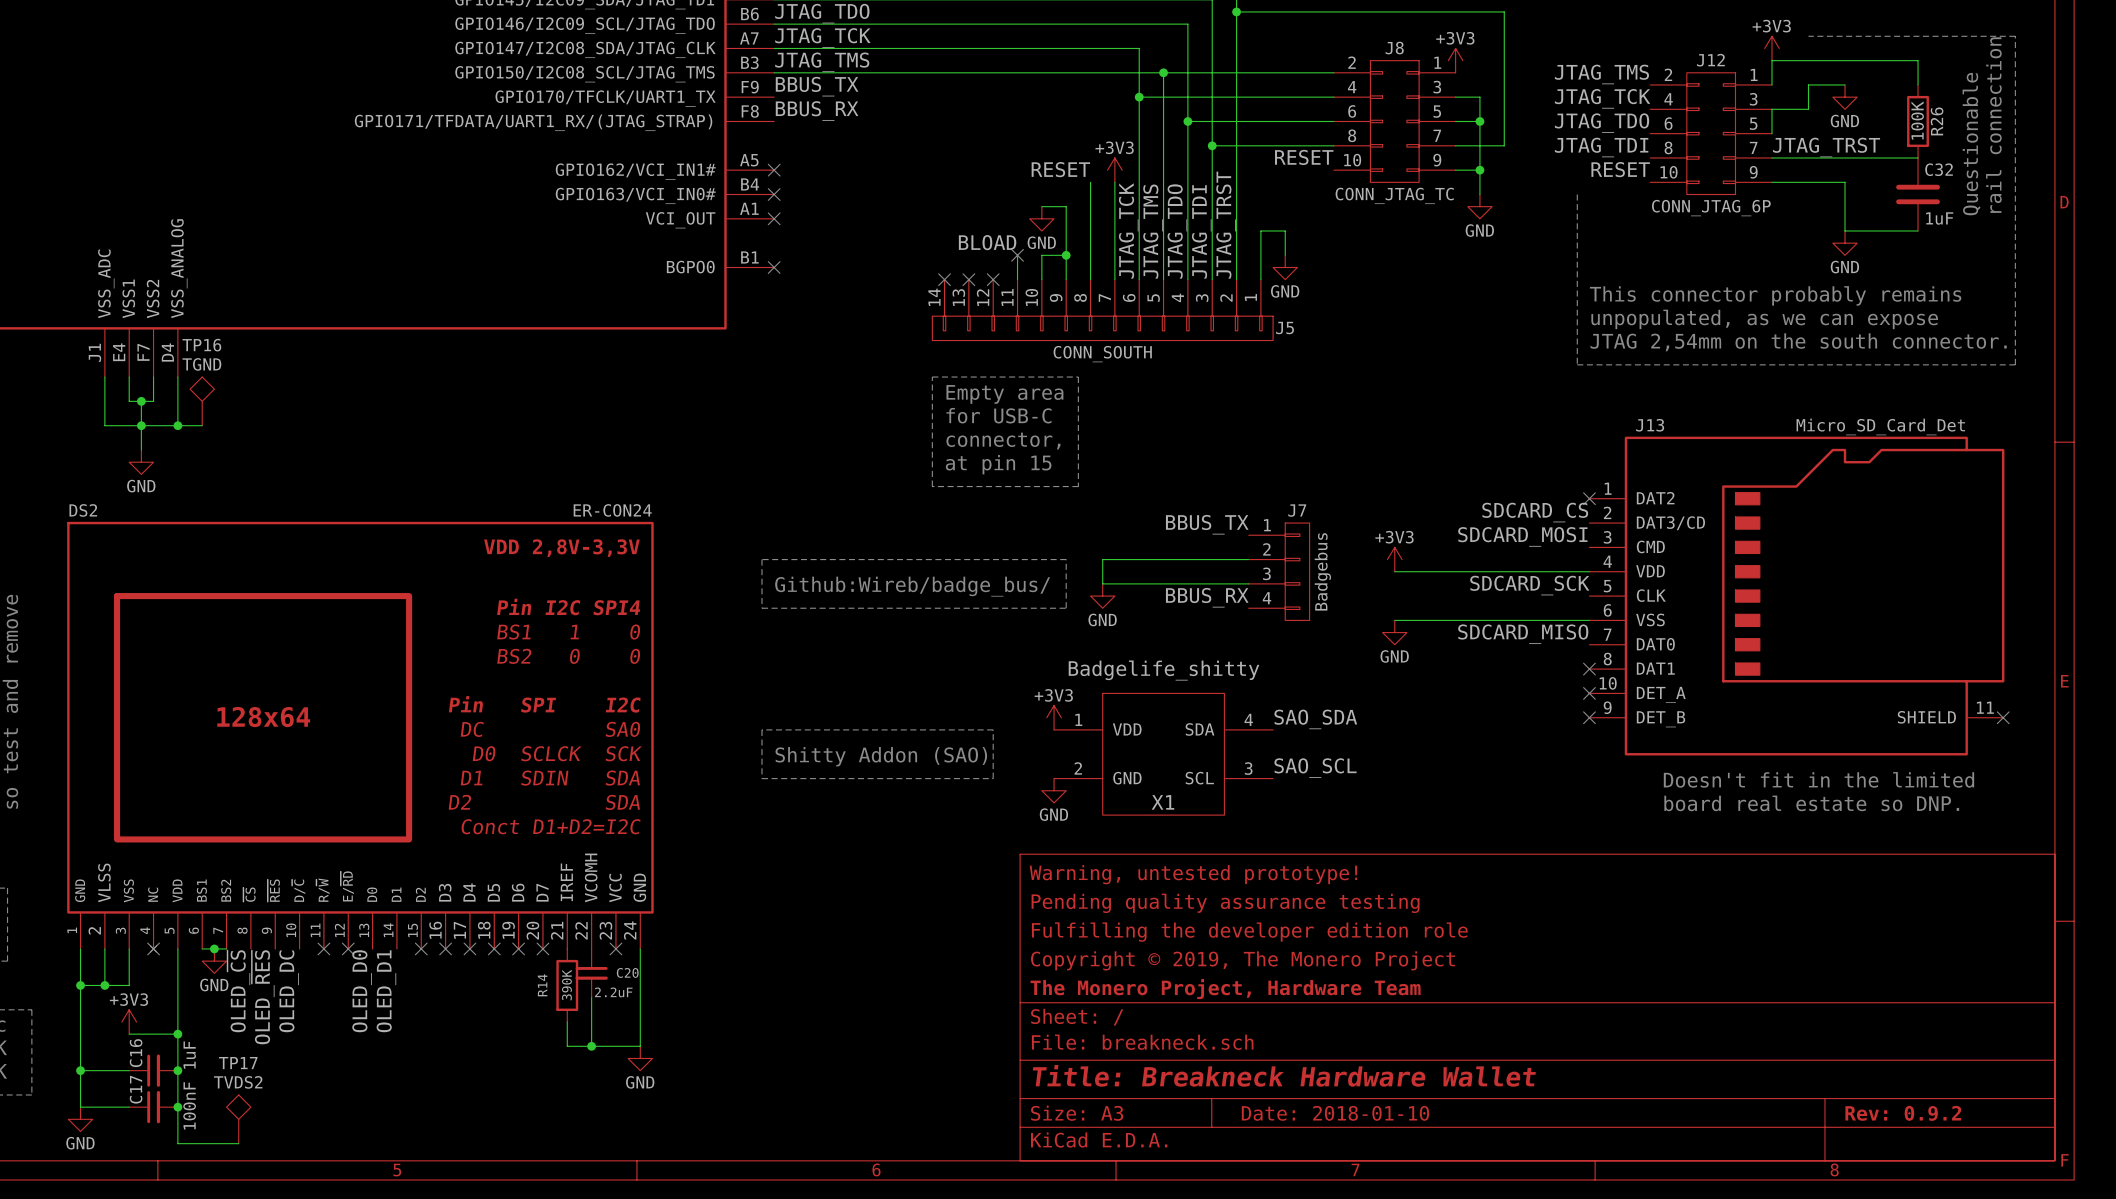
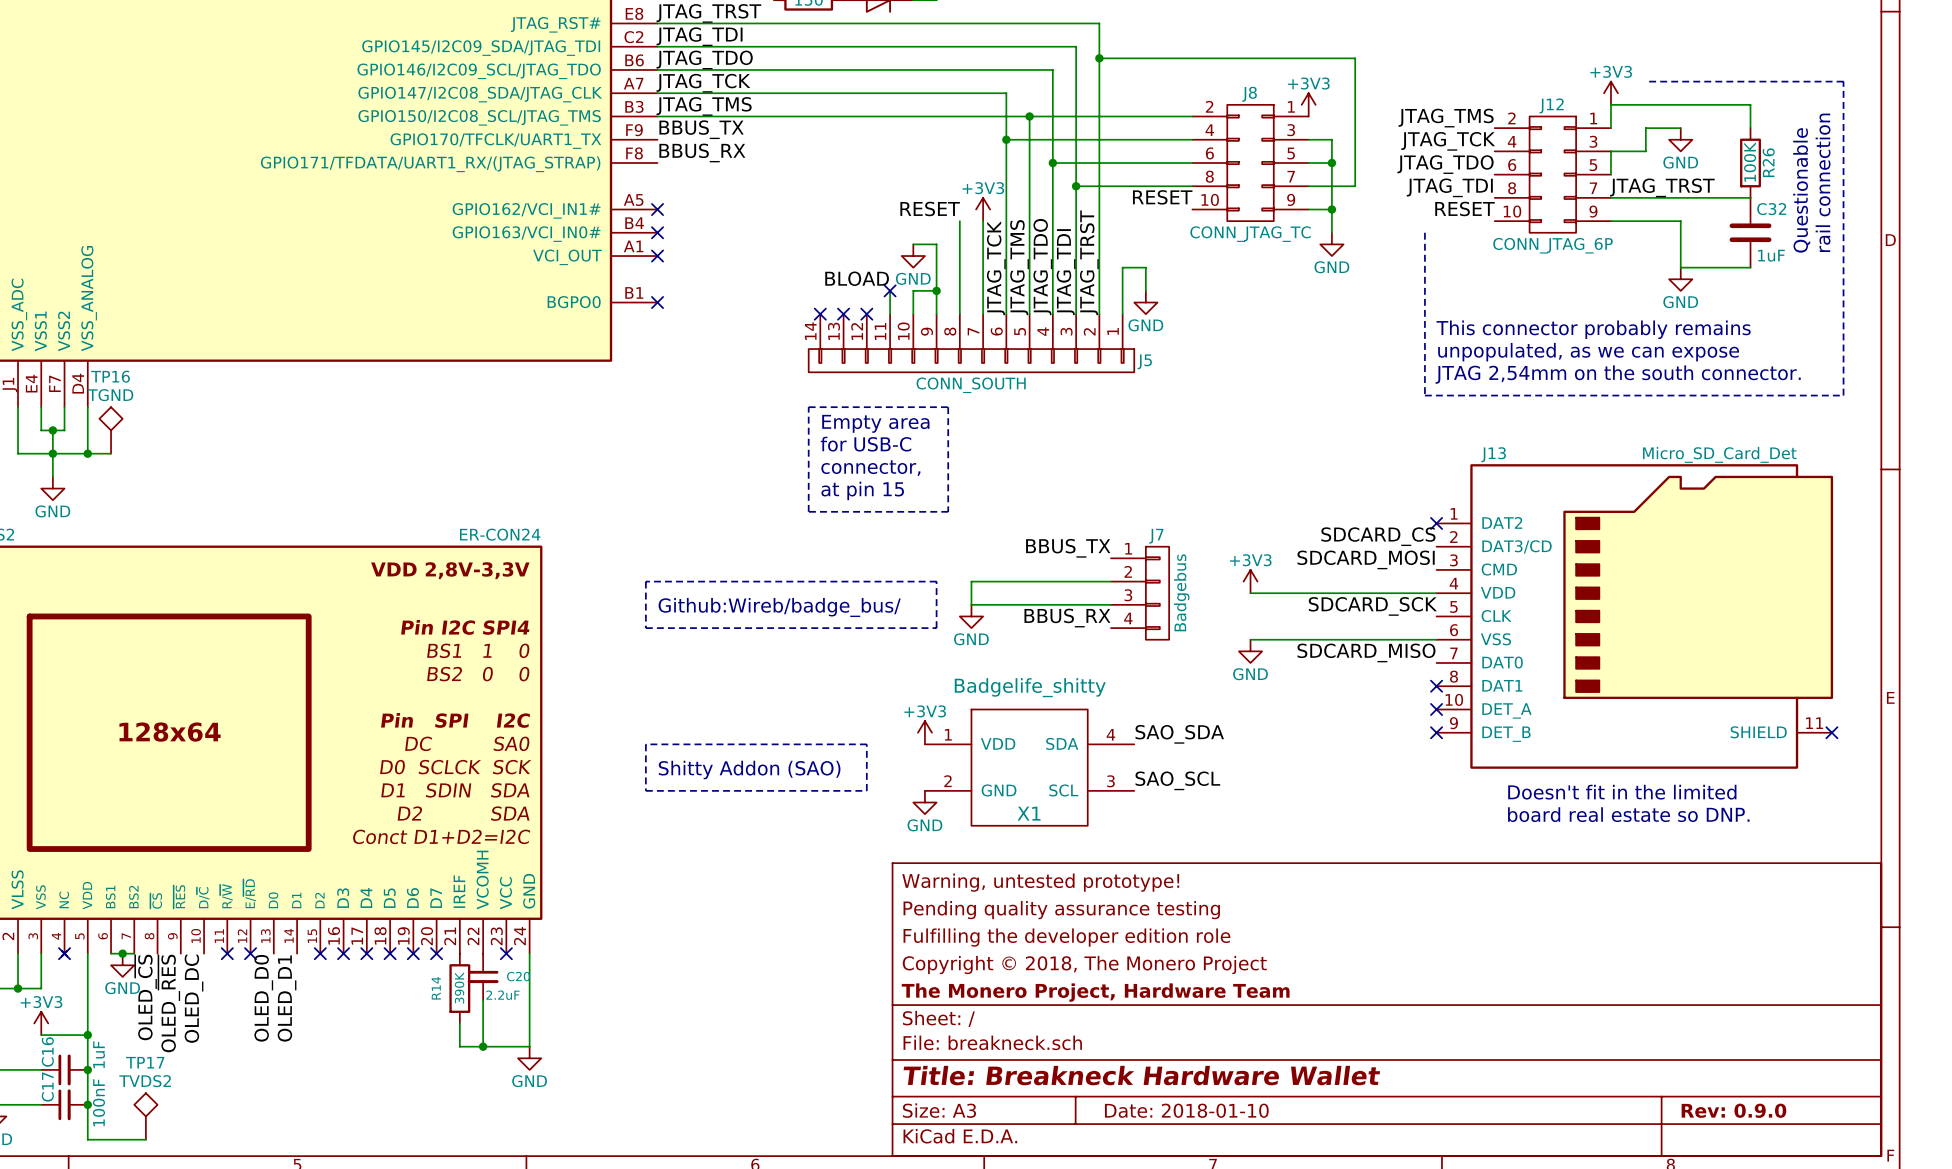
title block: Copyright © 2019, The Monero Project (1243, 960) -> Copyright © 2018, The Monero Project (1084, 965)
title block: Rev: 0.9.2 (1903, 1113) -> Rev: 0.9.0 (1733, 1110)

